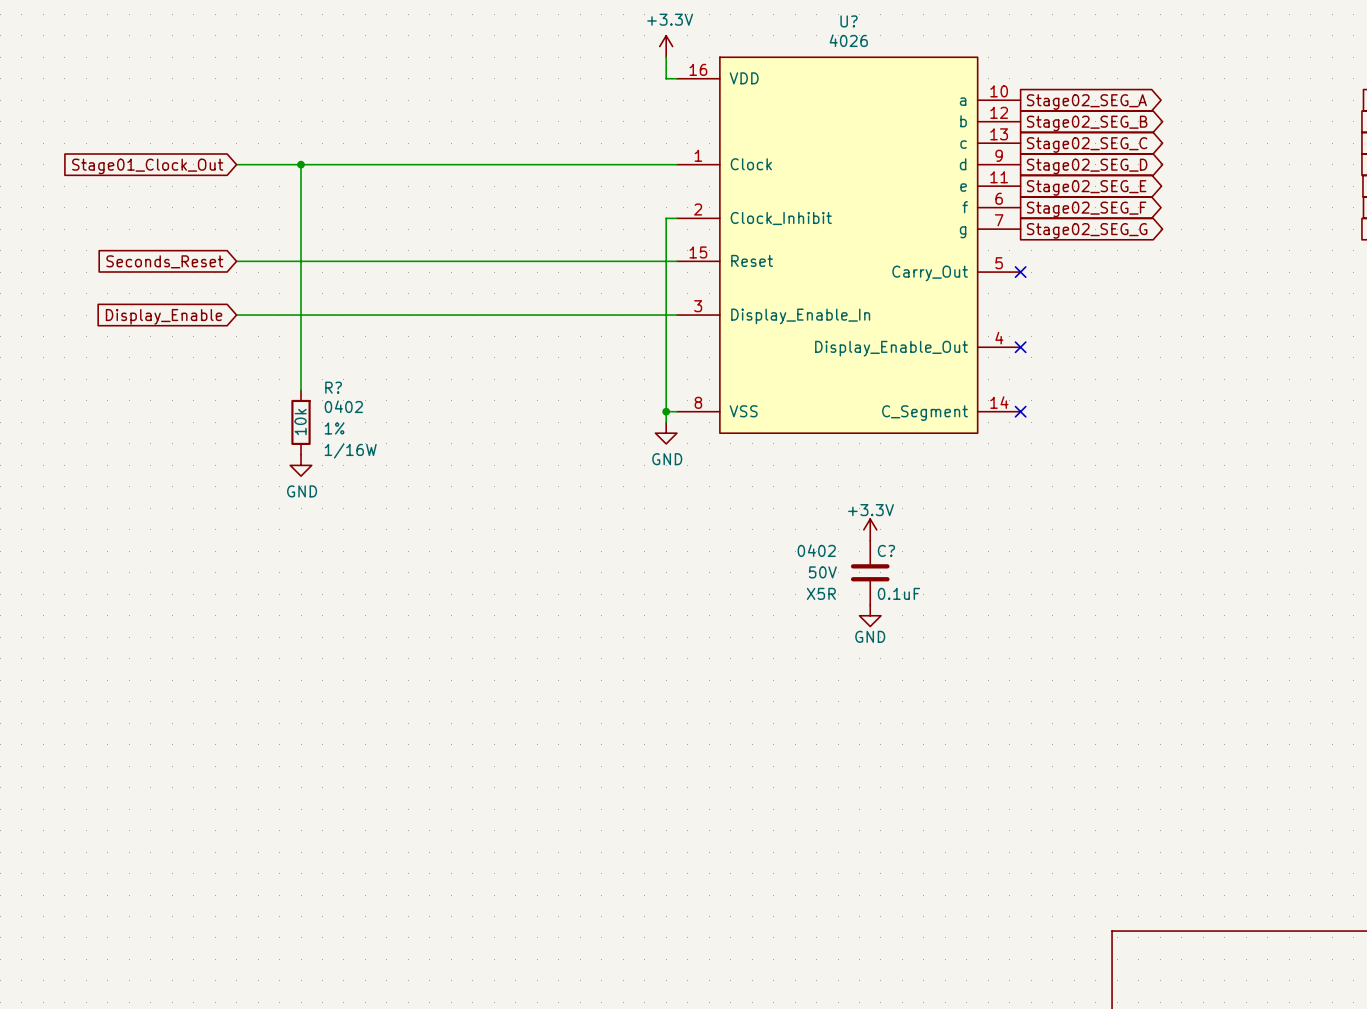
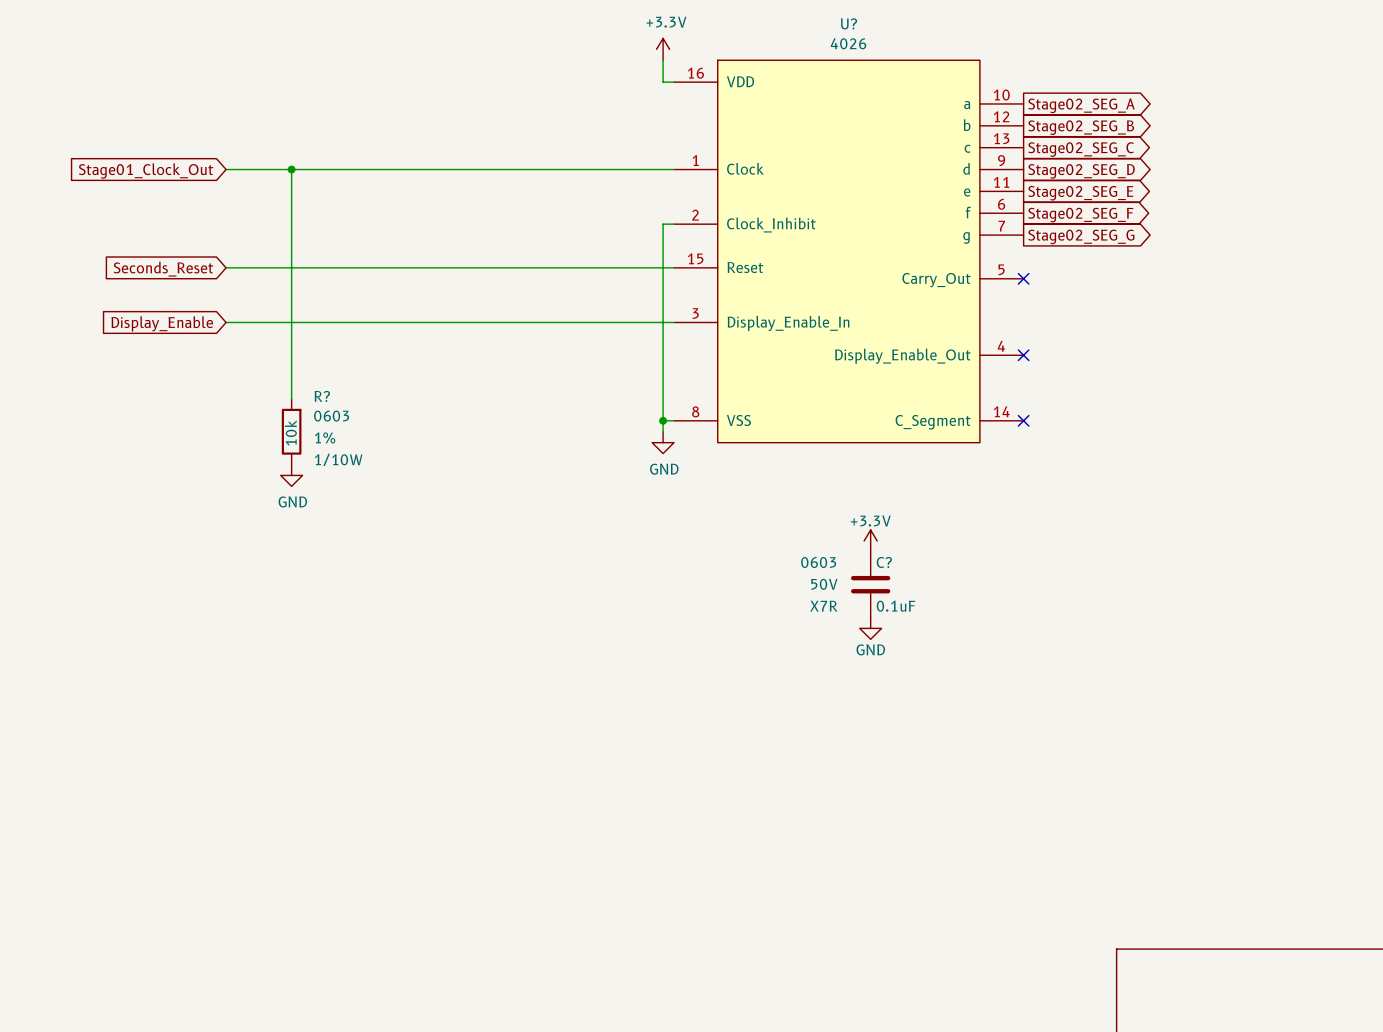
R? text: 0402 (343, 406) -> 0603 (331, 416)
R? text: 1/16W (350, 450) -> 1/10W (338, 459)
C? text: 0402 (816, 550) -> 0603 (818, 562)
C? text: X5R (821, 593) -> X7R (823, 606)

